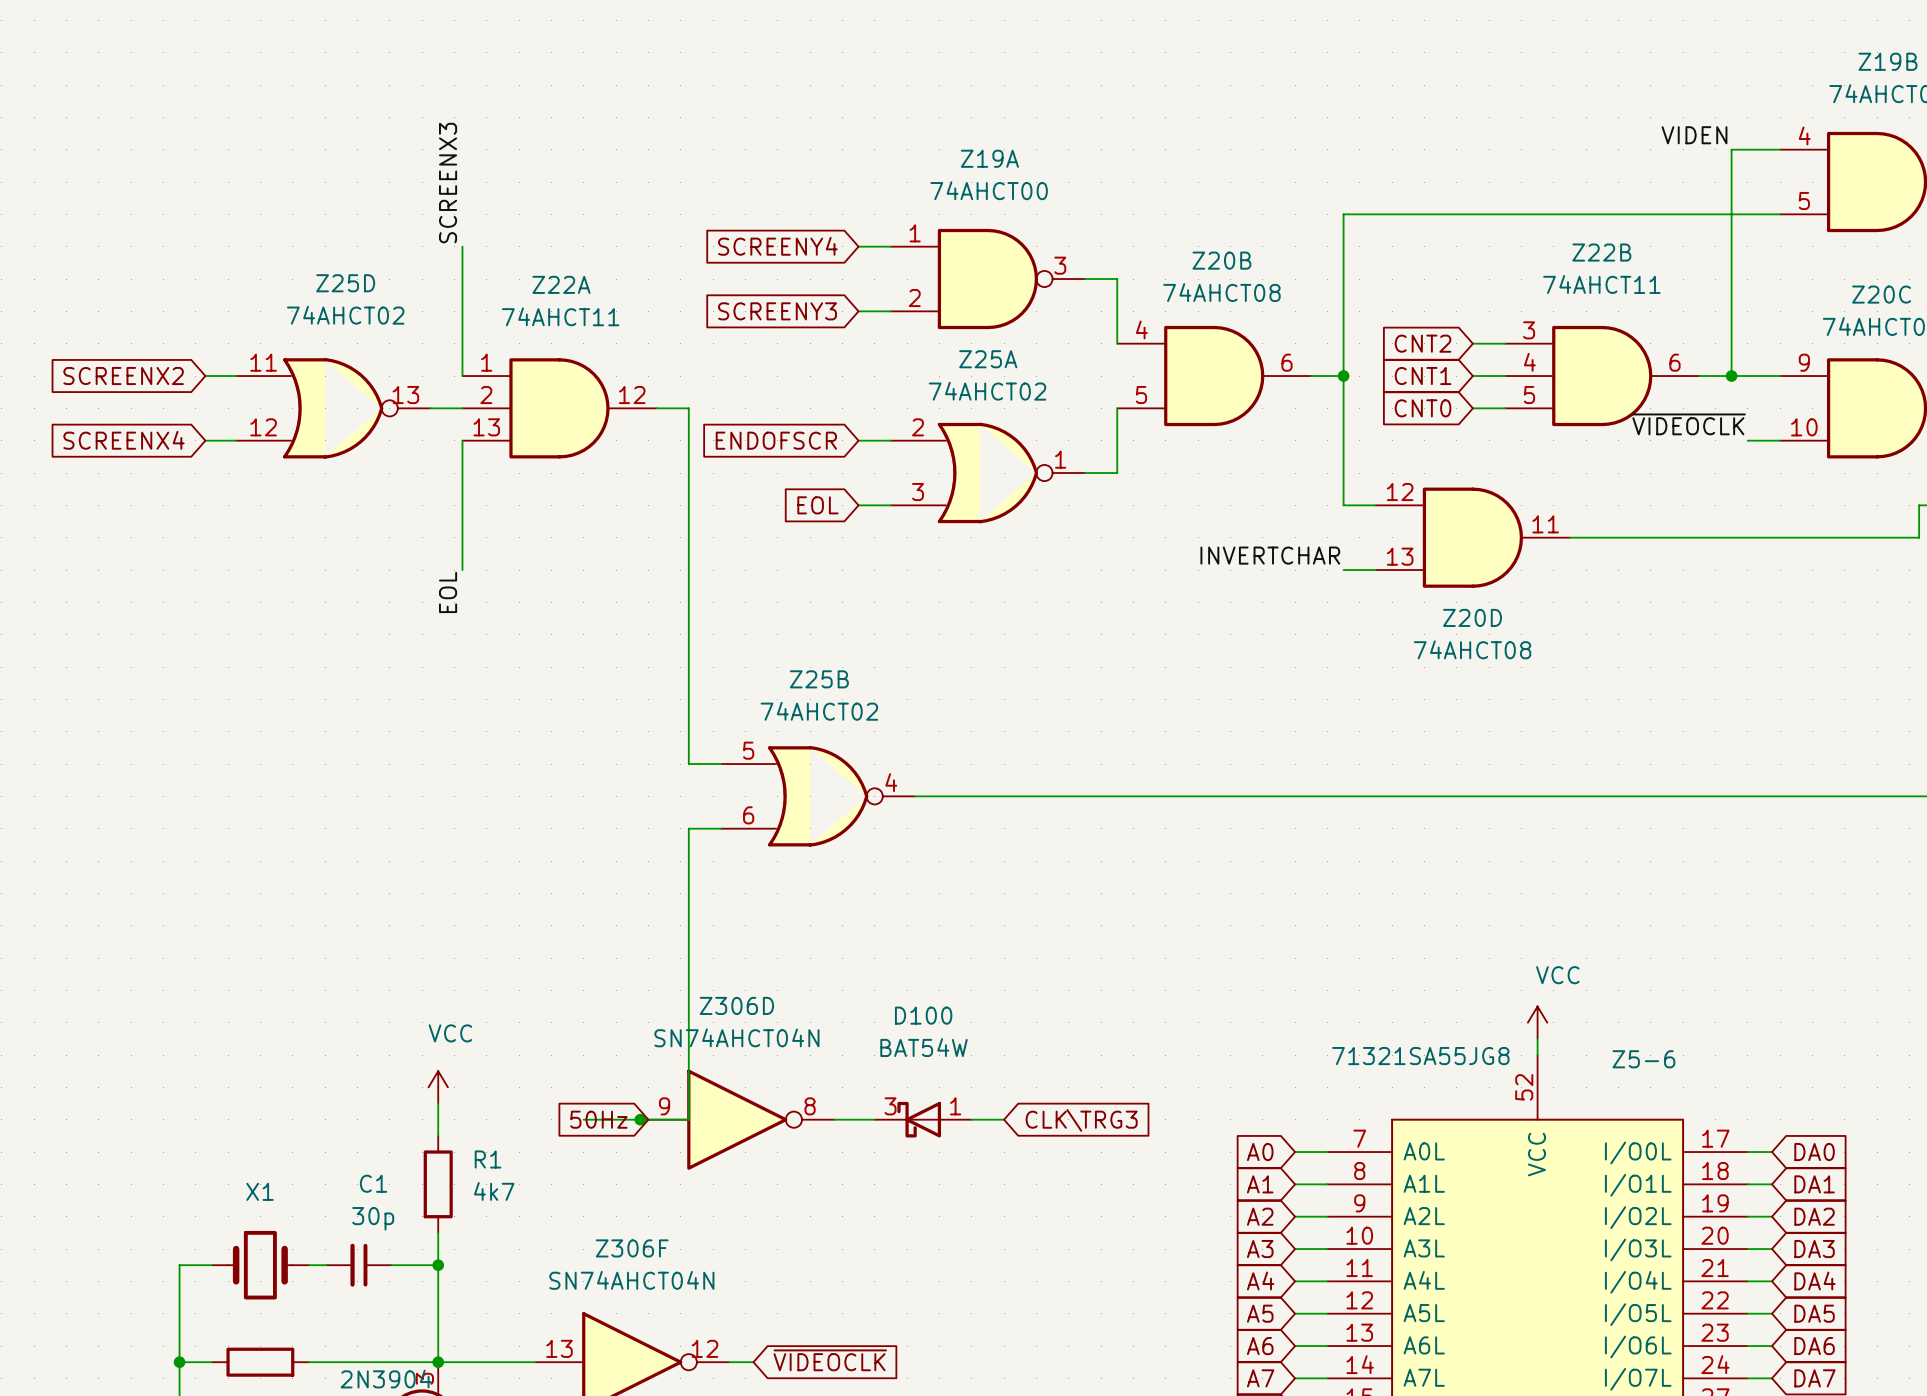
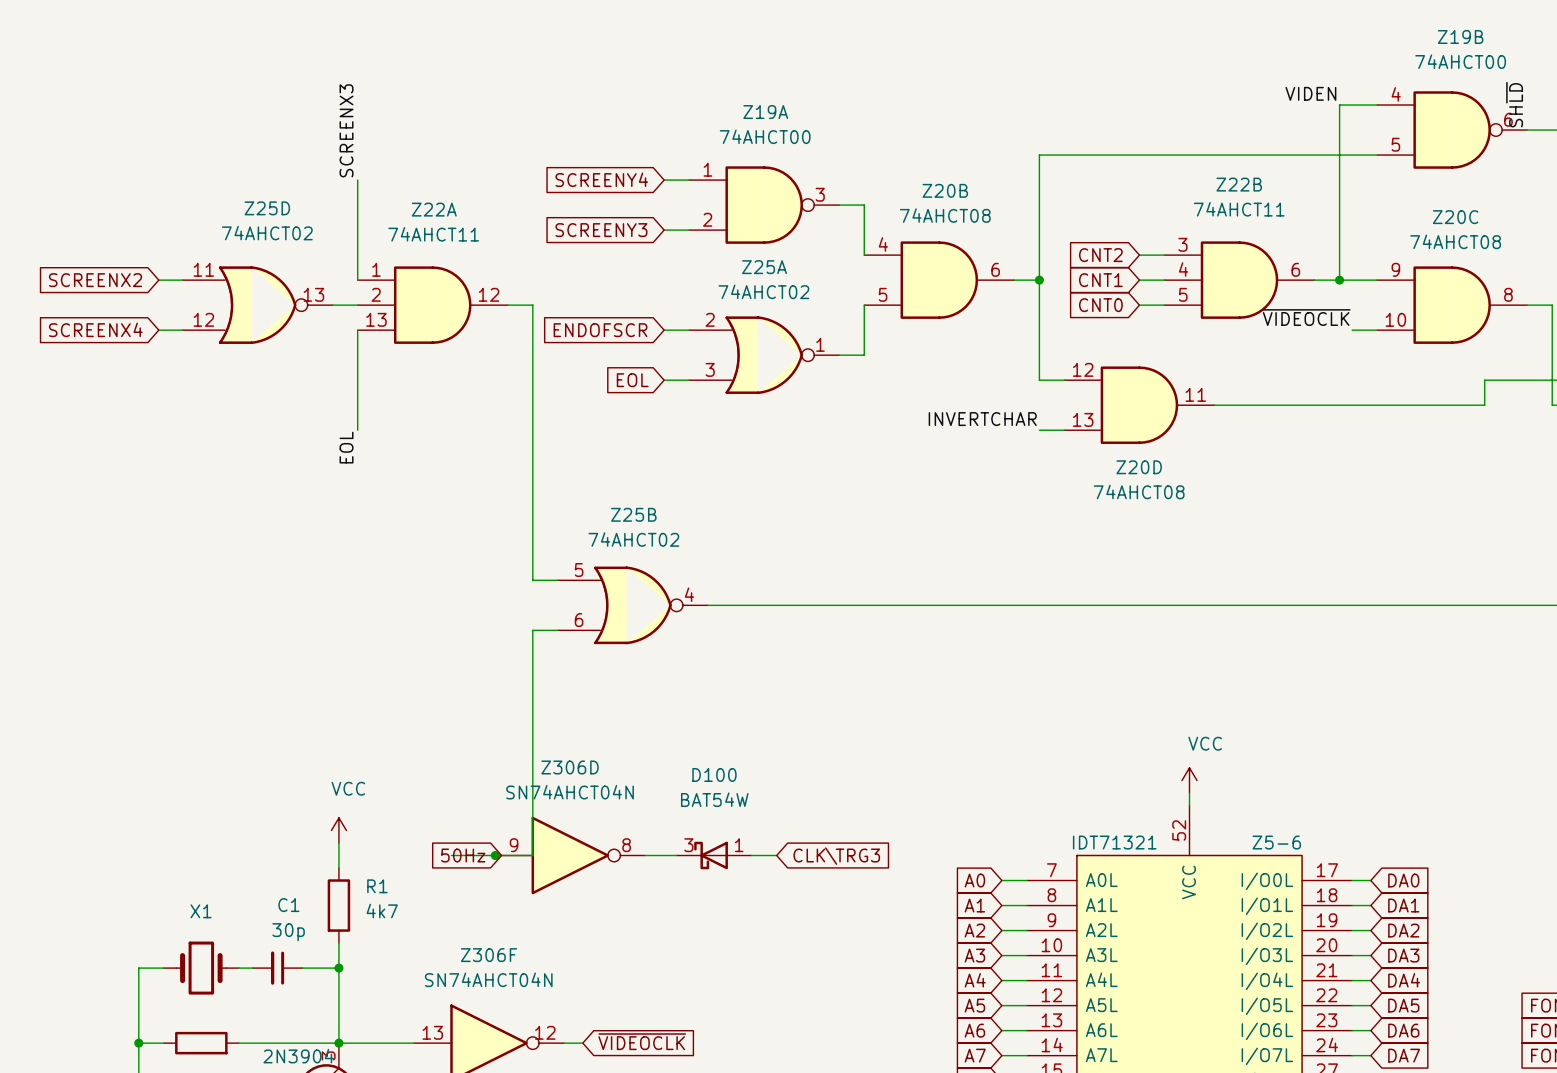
Z5-6 value: 71321SA55JG8 (1420, 1056) -> IDT71321 (1114, 842)
Z5-6 name position: Z5-6 (1643, 1059) -> Z5-6 (1276, 842)

